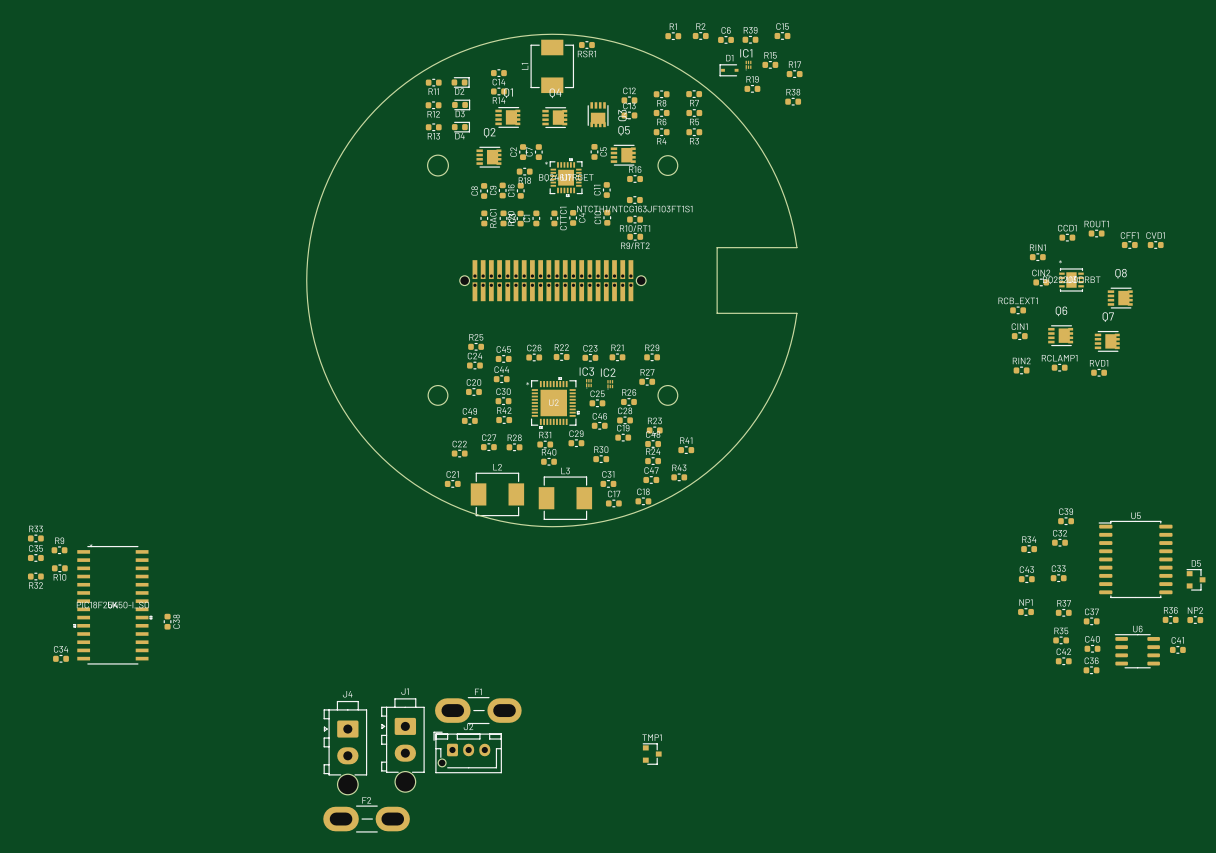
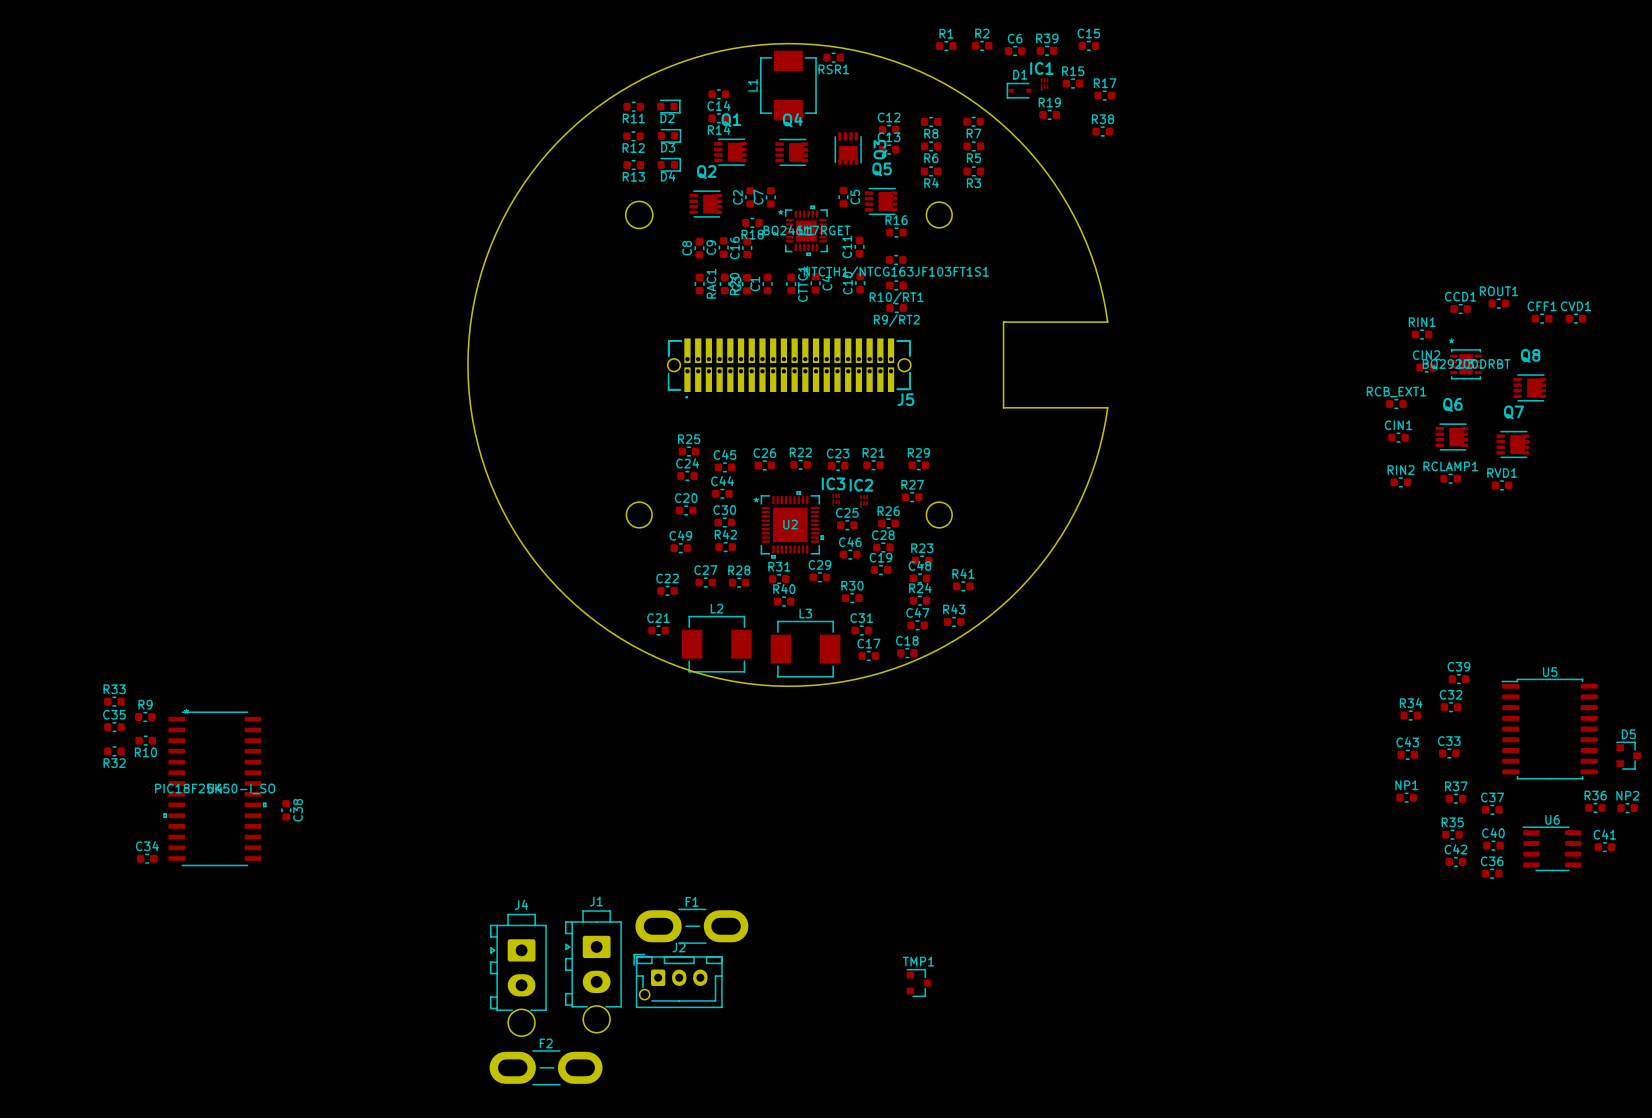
part: (552, 280) -> none
J5: none -> (789, 368)

